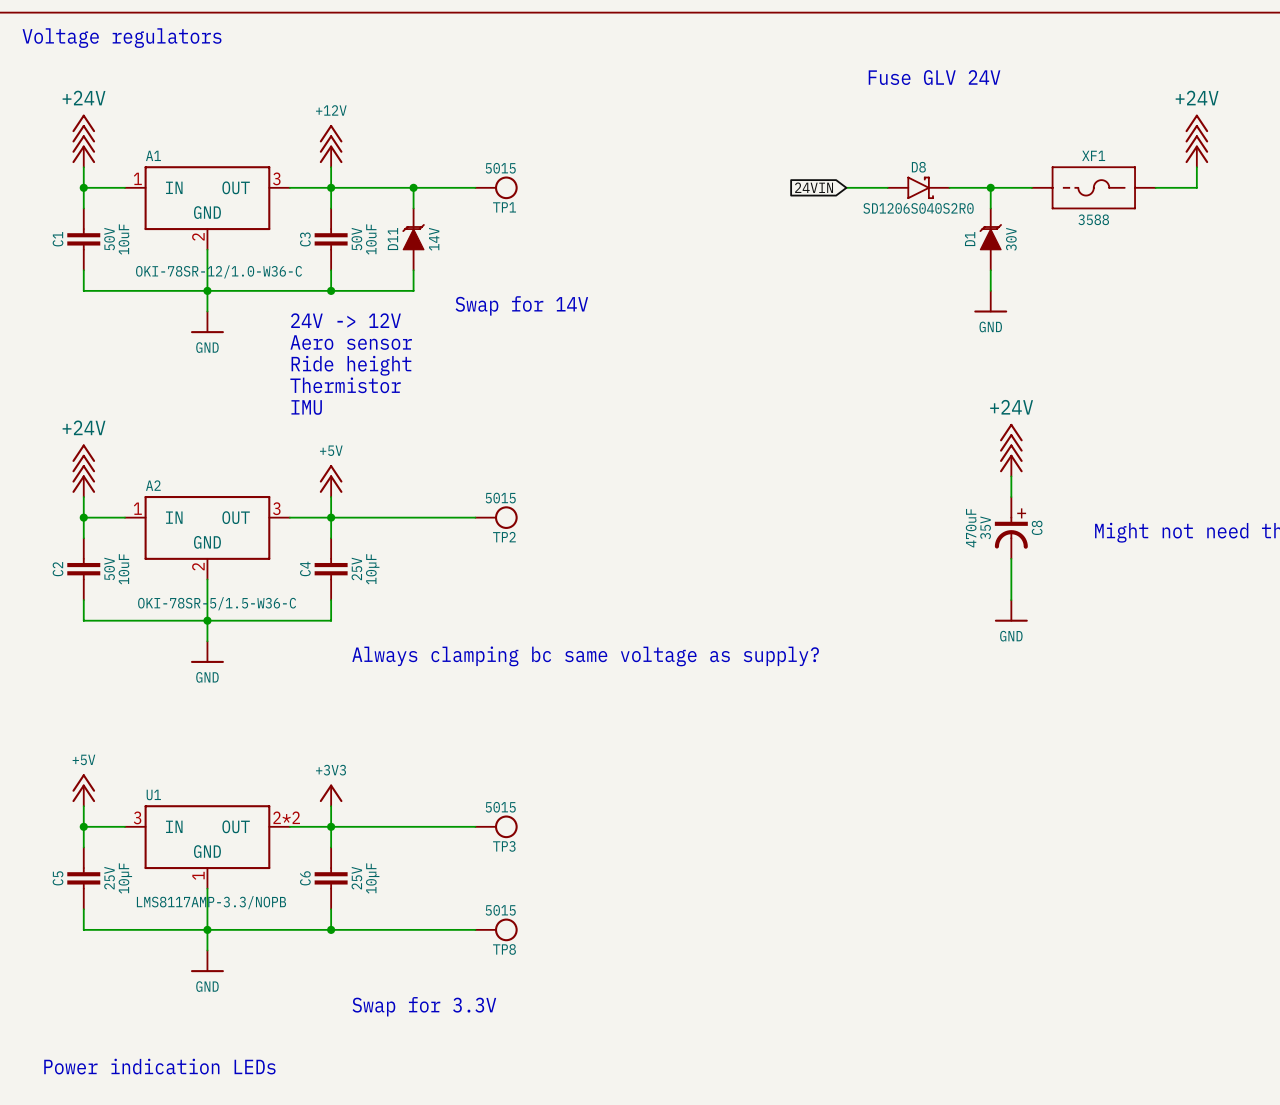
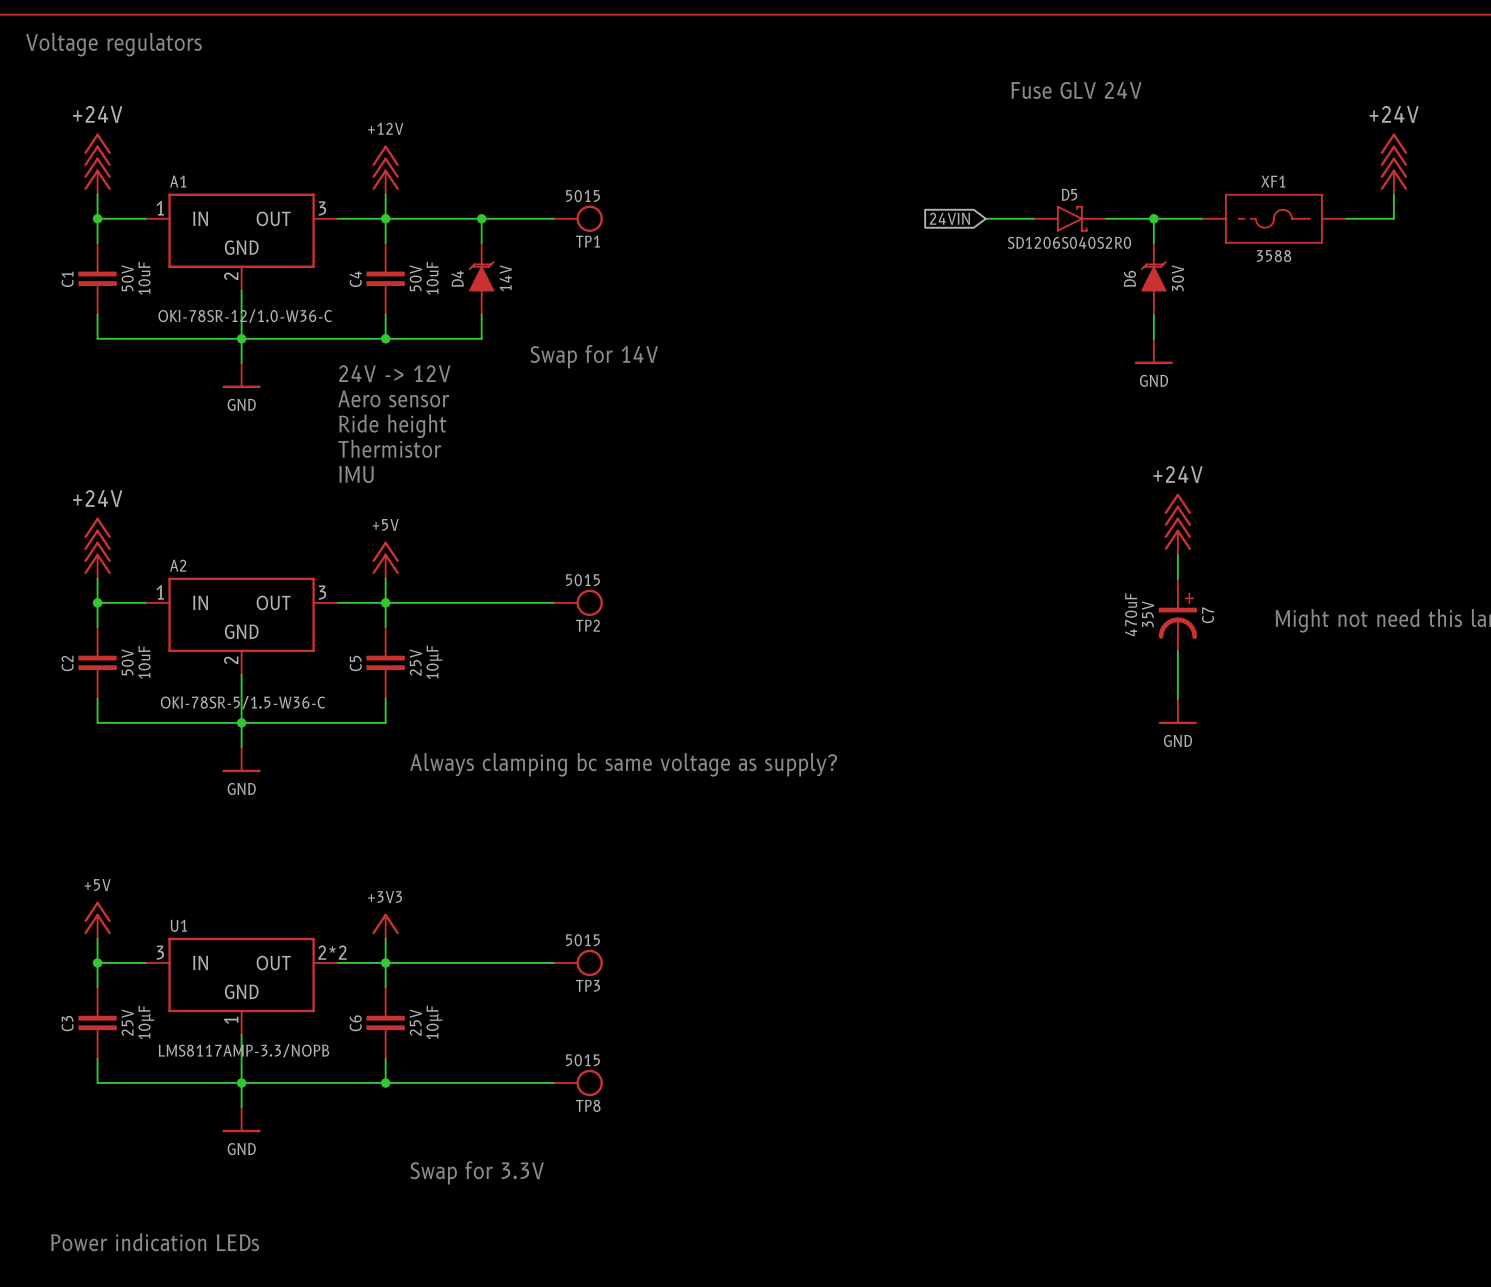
D8 name: D8 (918, 167) -> D5 (1069, 194)
C3 name: C3 (305, 239) -> C4 (355, 279)
D11 name: D11 (392, 239) -> D4 (457, 278)
D1 name: D1 (970, 239) -> D6 (1129, 278)
C8 name: C8 (1037, 527) -> C7 (1207, 615)
C4 name: C4 (305, 568) -> C5 (355, 663)
C5 name: C5 (58, 878) -> C3 (67, 1023)

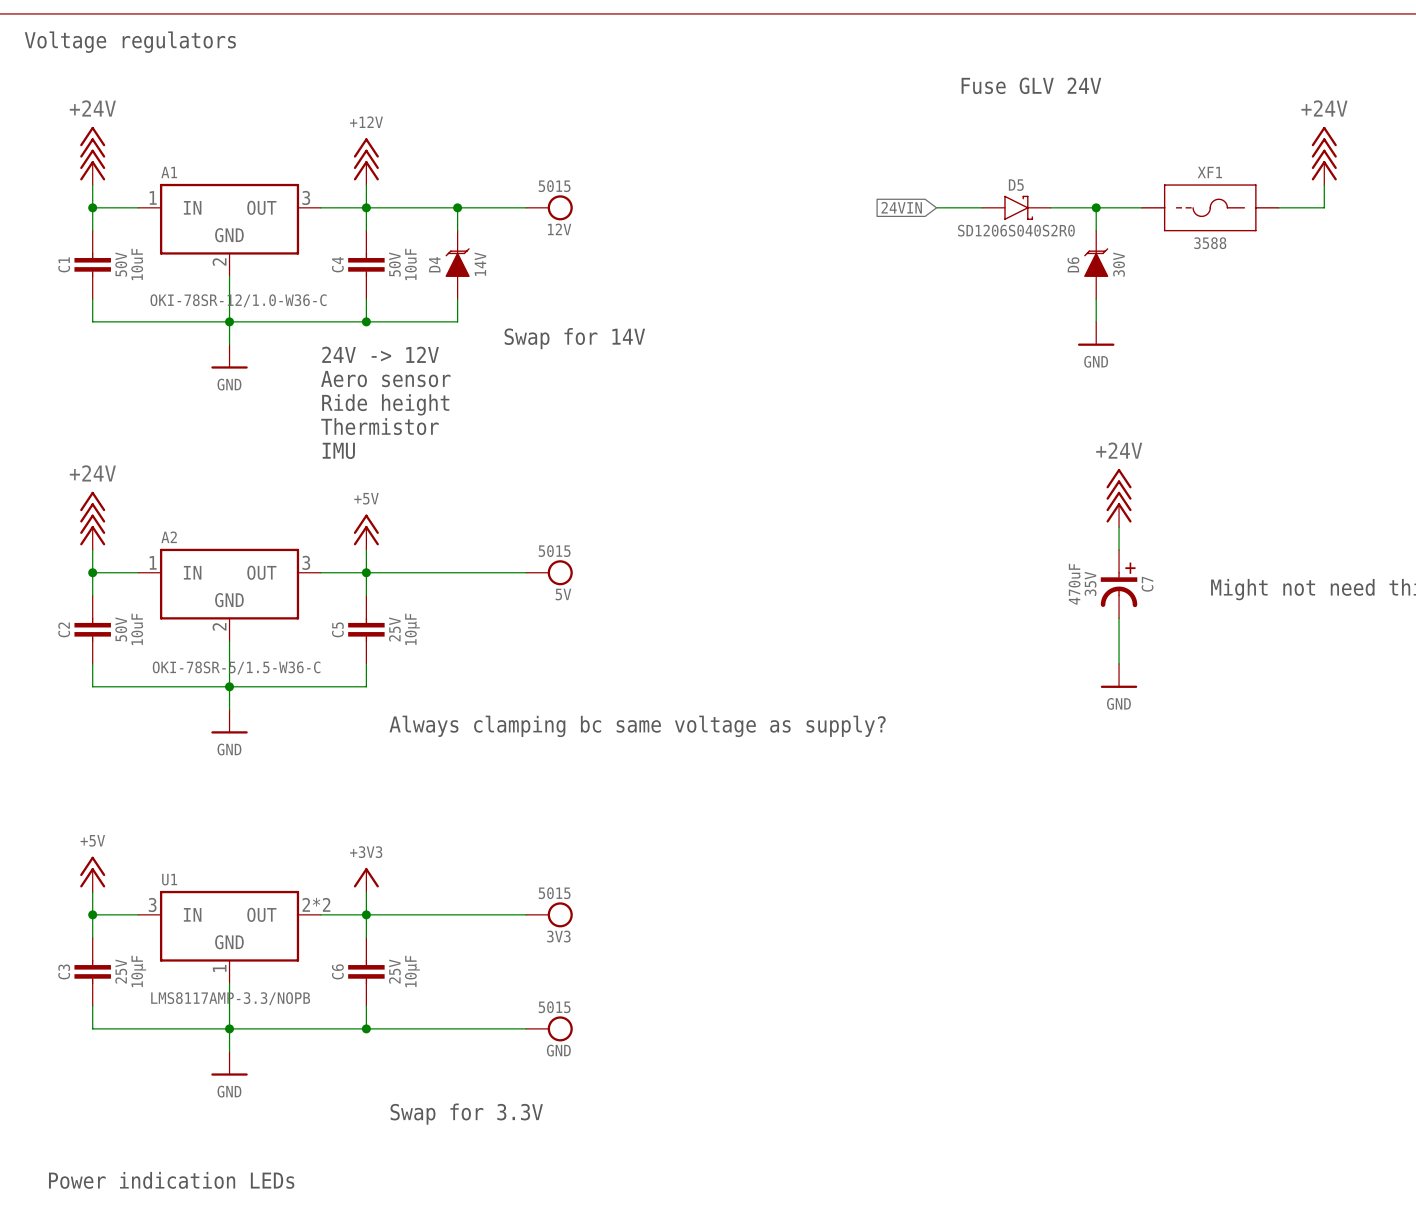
TP1 name: TP1 (587, 241) -> 12V (559, 229)
TP2 name: TP2 (587, 625) -> 5V (563, 594)
TP3 name: TP3 (587, 985) -> 3V3 (558, 936)
TP8 name: TP8 (588, 1105) -> GND (558, 1050)

